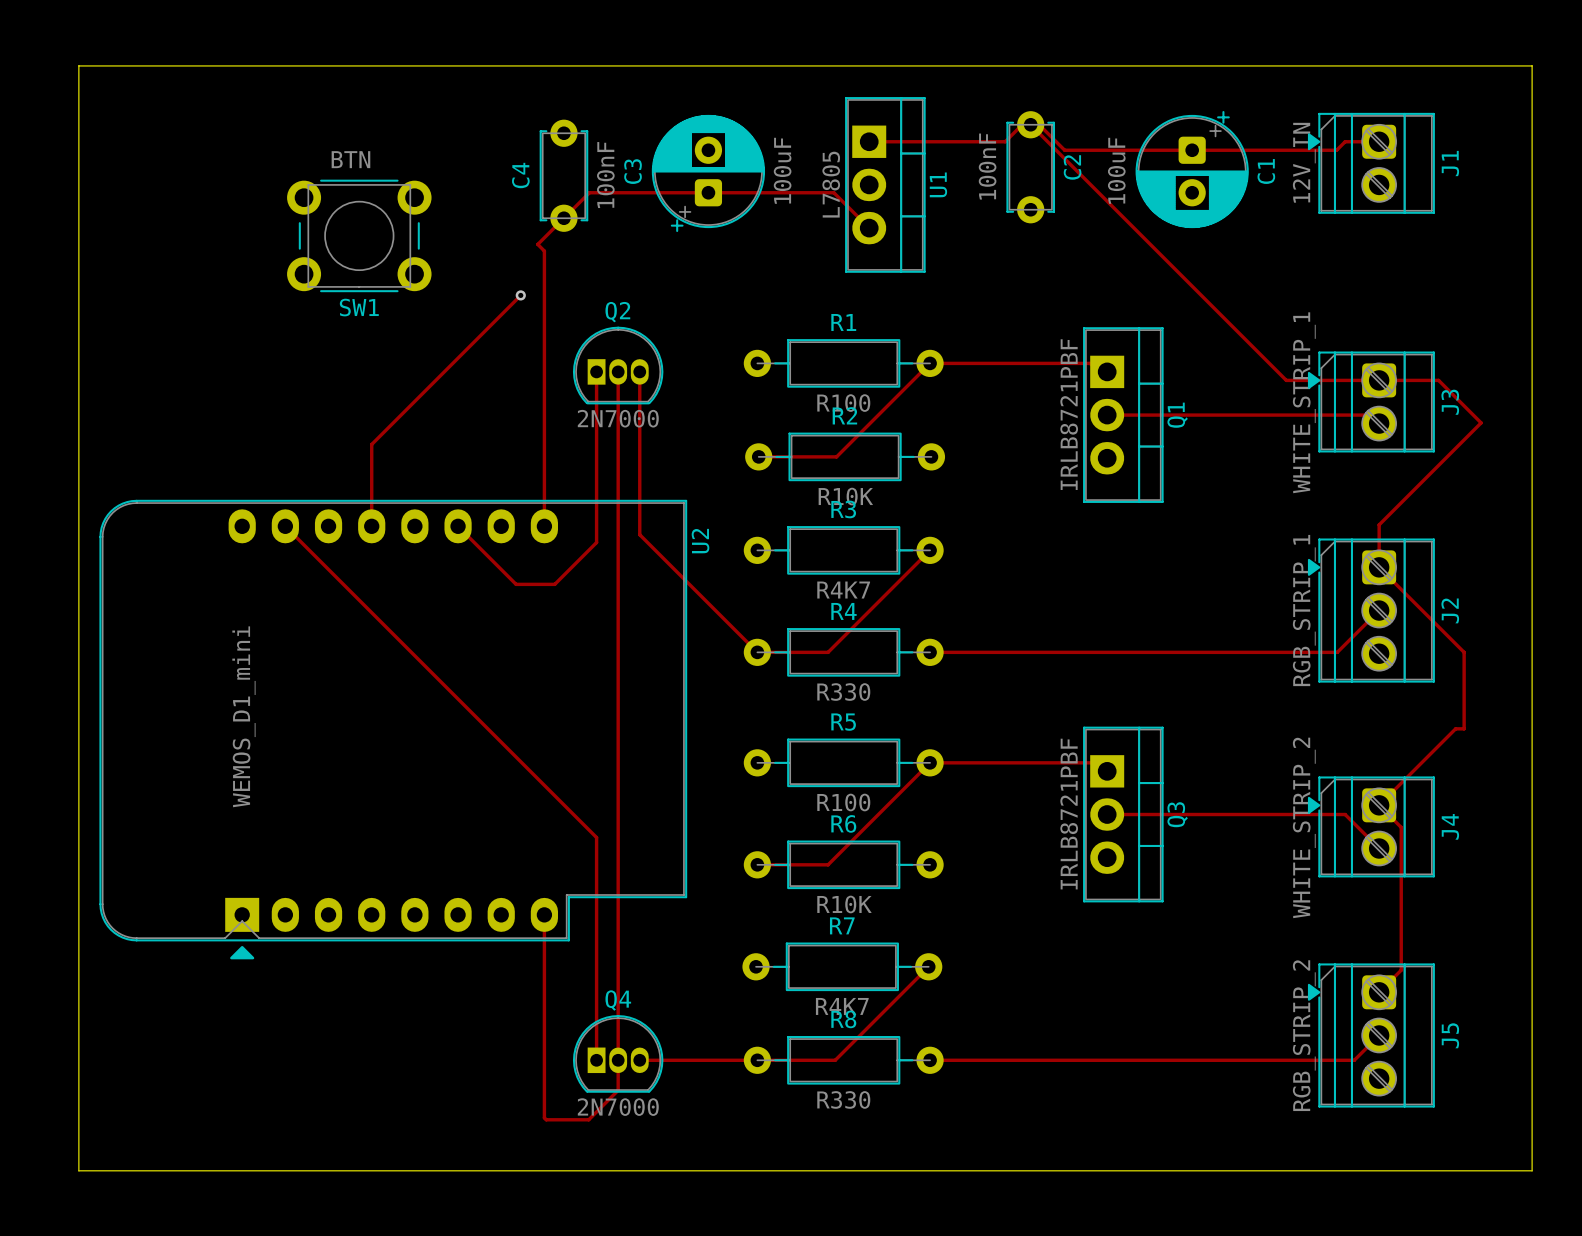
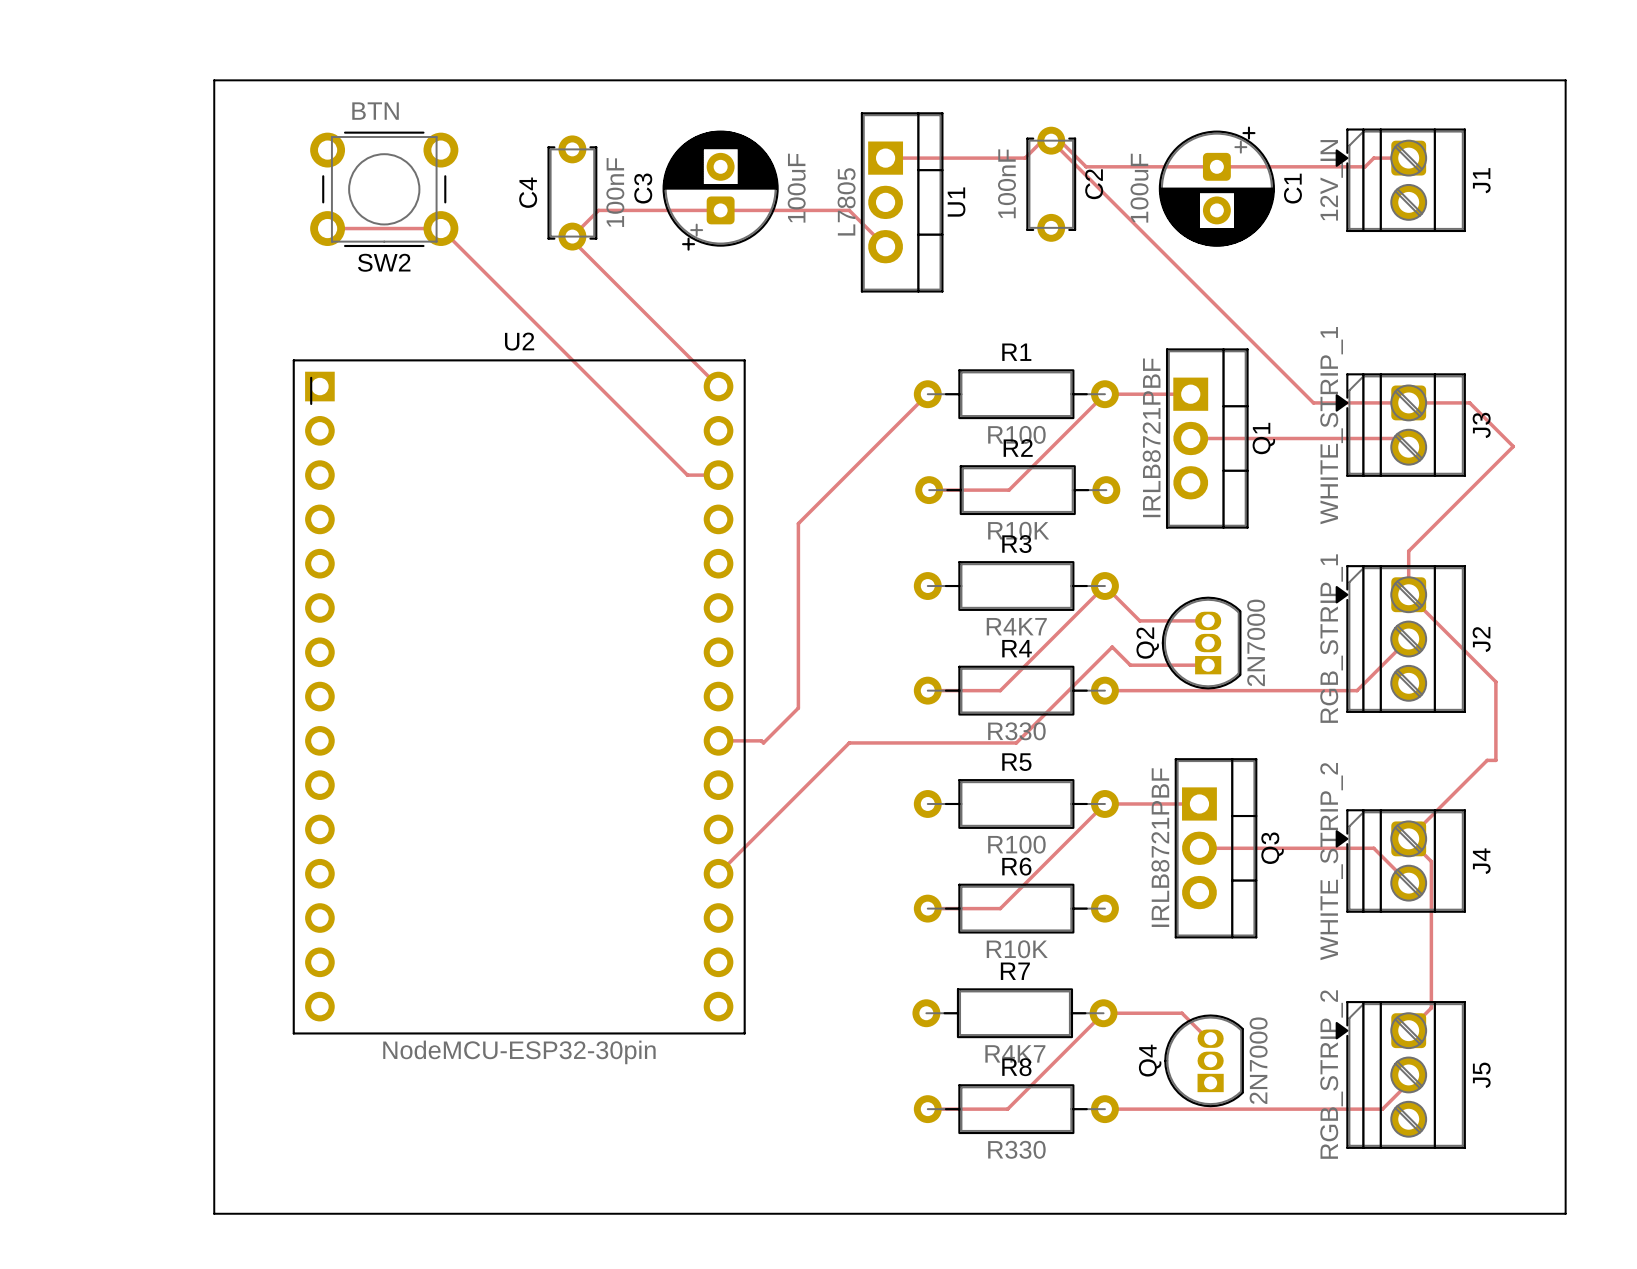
board edge: (214, 65) (78, 65) (78, 1170) (214, 1170) -> (214, 80) (214, 1213)
SW2: none -> BTN (384, 189)
track: none -> (327, 228) (440, 228) (687, 475) (718, 475)
track: (563, 218) (537, 244) (544, 251) (544, 526) -> (572, 236) (572, 240) (718, 386)
SW1: BTN (359, 235) -> none
track: (520, 295) (371, 444) (371, 526) -> none
via: (520, 295) -> none
R1 position: (843, 363) -> (1016, 394)
Q2 rotation: 0° (618, 365) -> 90° counterclockwise (1201, 643)
Q2 position: (618, 365) -> (1201, 643)
track: (596, 371) (596, 542) (554, 584) (516, 584) (458, 526) -> none
track: (618, 371) (618, 1090) (588, 1119) (546, 1119) (544, 1117) (544, 914) -> none
track: (639, 371) (639, 534) (757, 652) (828, 652) (930, 550) -> none
track: none -> (927, 394) (798, 523) (798, 708) (763, 742) (761, 740) (718, 740)
track: (1098, 371) (1090, 363) (930, 363) (836, 456) (758, 456) -> (1120, 394) (1104, 394) (1009, 490) (929, 490)
track: (1107, 415) (1166, 415) -> (1129, 394) (1190, 394)
Q1 position: (1123, 415) -> (1207, 438)
R2 position: (845, 456) -> (1017, 490)
U2 footprint: [99, 499, 688, 960] -> [292, 359, 746, 1035]
track: (285, 526) (596, 837) (596, 1060) -> none
U2 name position: U2 (700, 541) -> U2 (519, 341)
R3 position: (843, 550) -> (1016, 586)
track: none -> (1208, 620) (1139, 620) (1104, 586) (1000, 690) (927, 690)
track: none -> (1208, 665) (1130, 665) (1112, 647) (1016, 742) (849, 742) (718, 873)
R4 position: (843, 652) -> (1016, 690)
track: (930, 652) (1337, 652) -> (1104, 690) (1357, 690) (1365, 681)
U2 value: WEMOS_D1_mini (243, 716) -> NodeMCU-ESP32-30pin (519, 1052)
R5 position: (843, 762) -> (1016, 803)
track: (1107, 771) (1098, 762) (930, 762) (828, 864) (757, 864) -> none
track: none -> (1199, 803) (1104, 803) (1000, 908) (927, 908)
track: (1107, 814) (1175, 814) -> none
Q3 position: (1123, 814) -> (1216, 848)
R6 position: (843, 864) -> (1016, 908)
R7 position: (842, 966) -> (1014, 1013)
track: (928, 966) (835, 1060) (639, 1060) -> none
track: none -> (1210, 1038) (1208, 1039) (1182, 1013) (1103, 1013) (1007, 1109) (927, 1109)
track: (1379, 1035) (1354, 1060) (930, 1060) -> (1408, 1074) (1408, 1082) (1382, 1109) (1104, 1109)
Q4 rotation: 0° (618, 1053) -> 90° counterclockwise (1204, 1060)
Q4 position: (618, 1053) -> (1204, 1060)
R8 position: (843, 1060) -> (1016, 1109)

